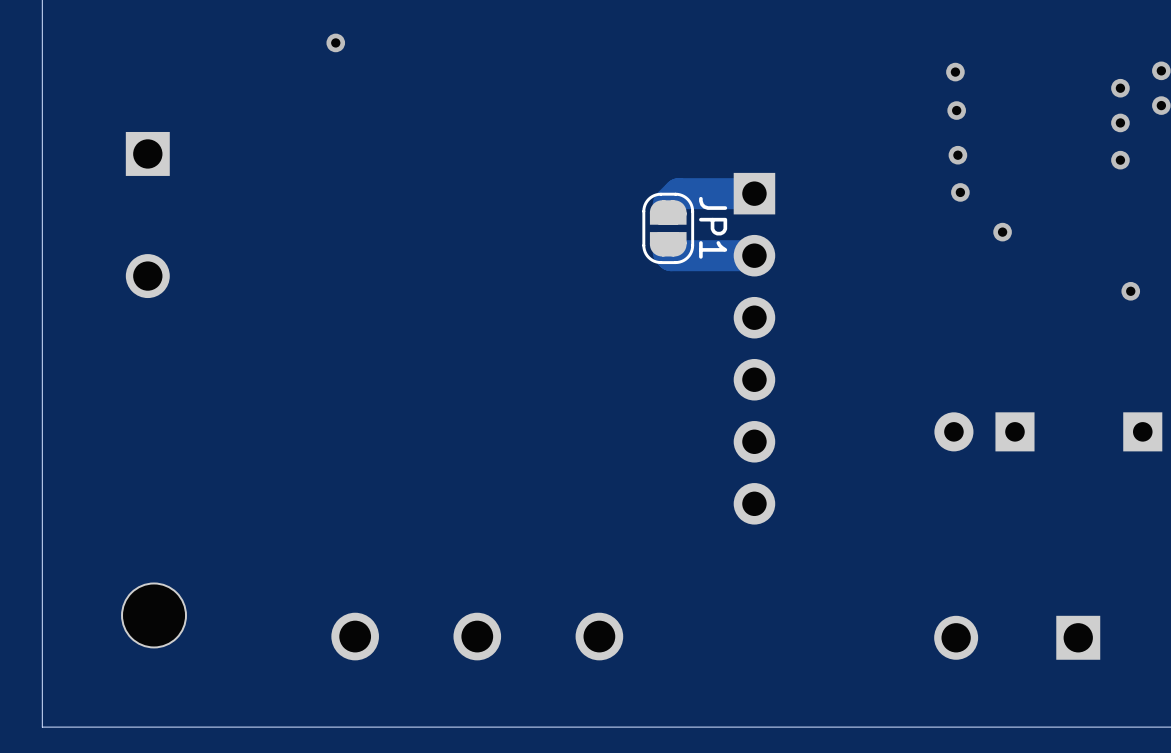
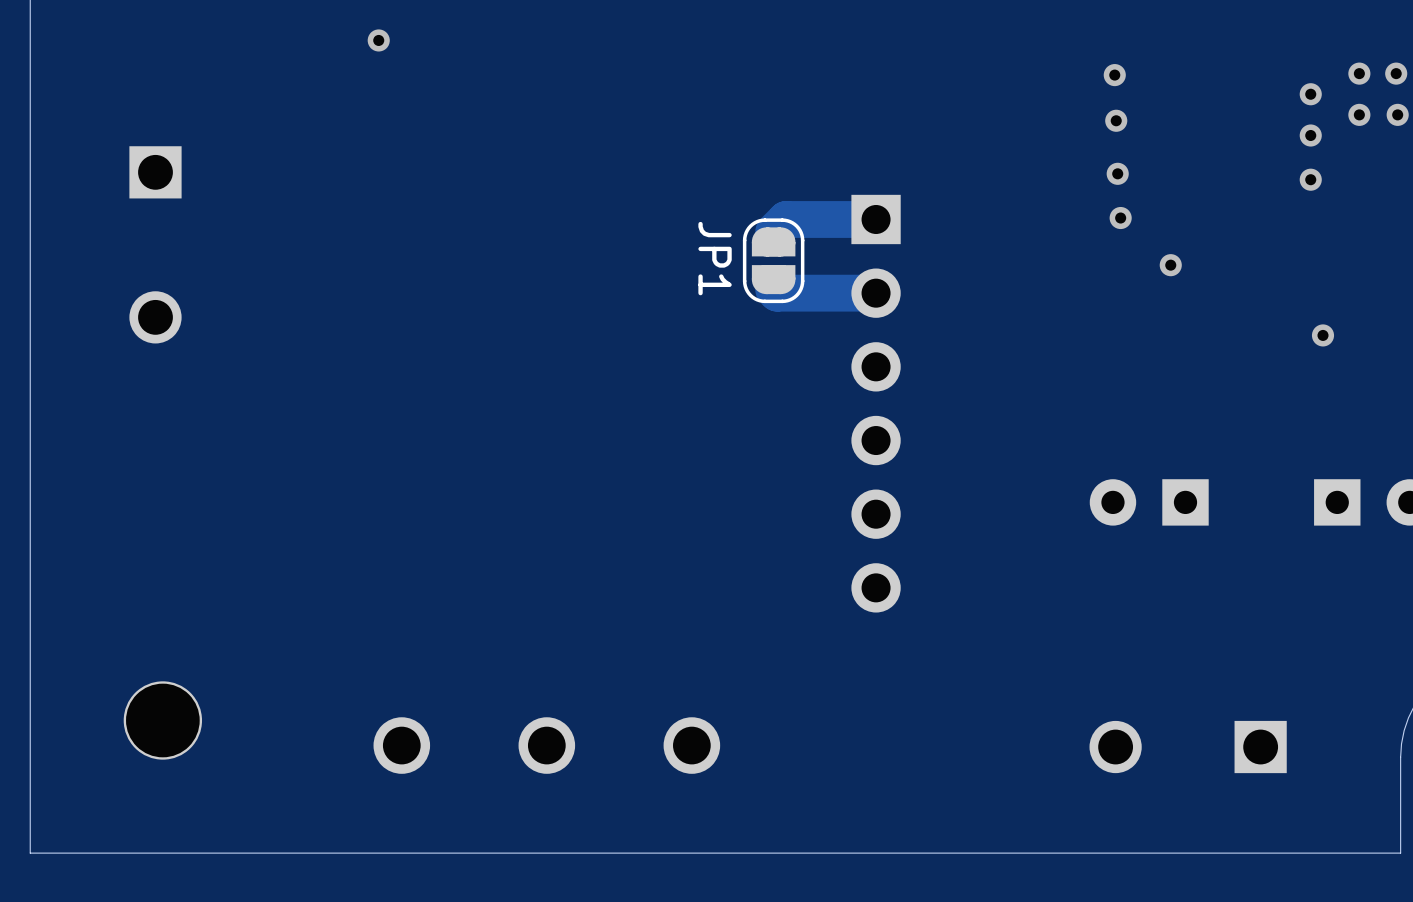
JP1 name position: JP1 (713, 227) -> JP1 (715, 258)

